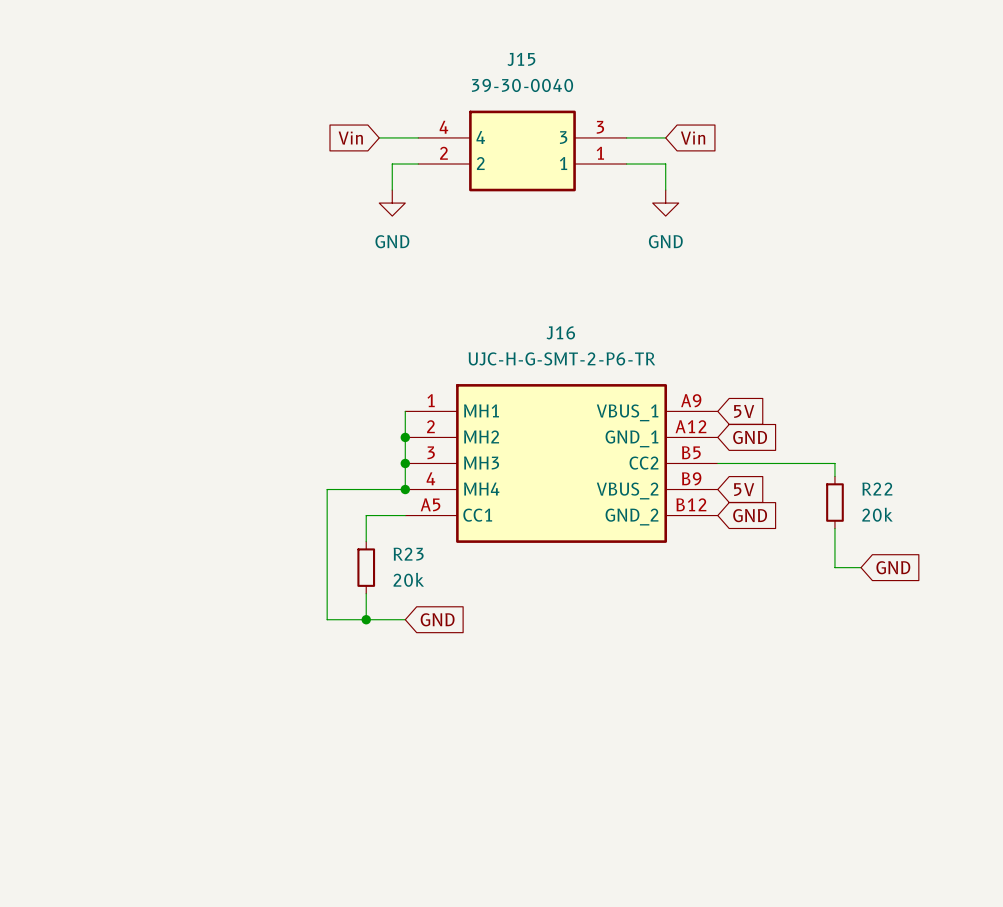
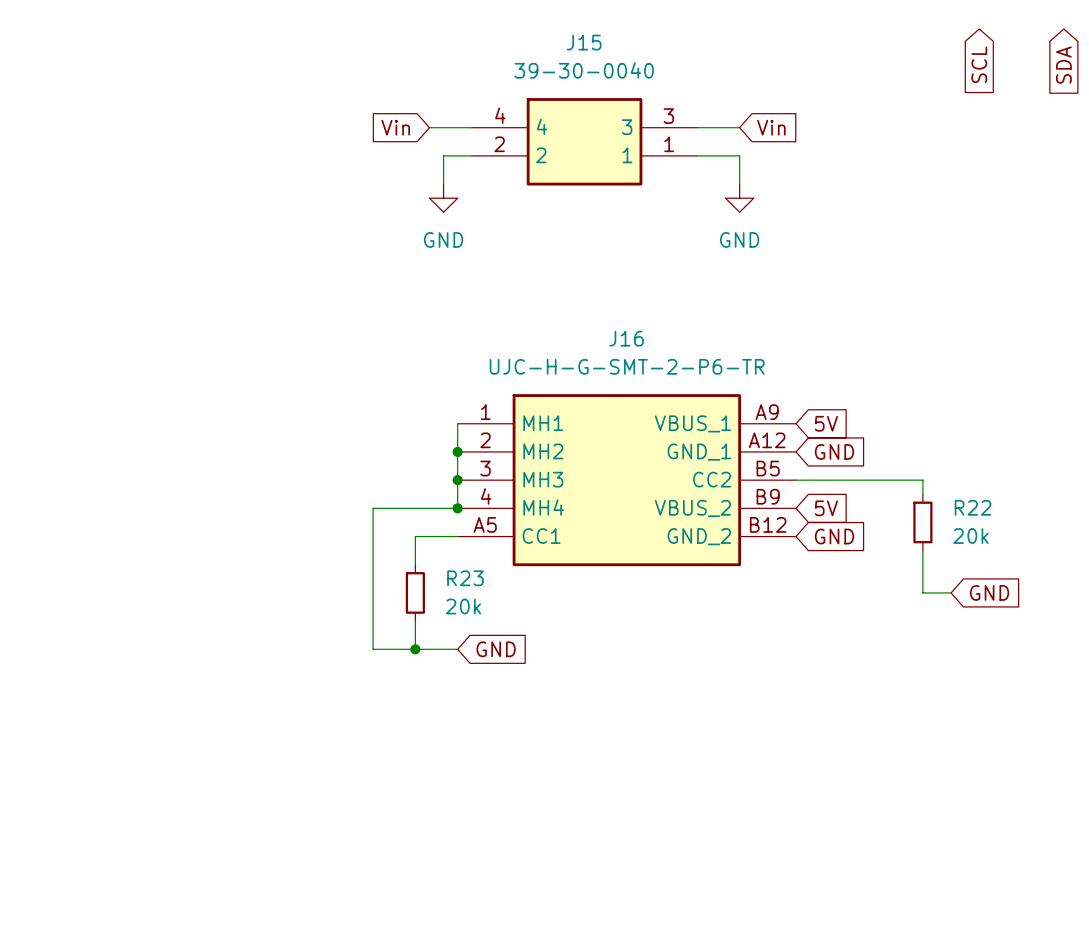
global label: none -> SCL (979, 64)
global label: none -> SDA (1063, 65)

